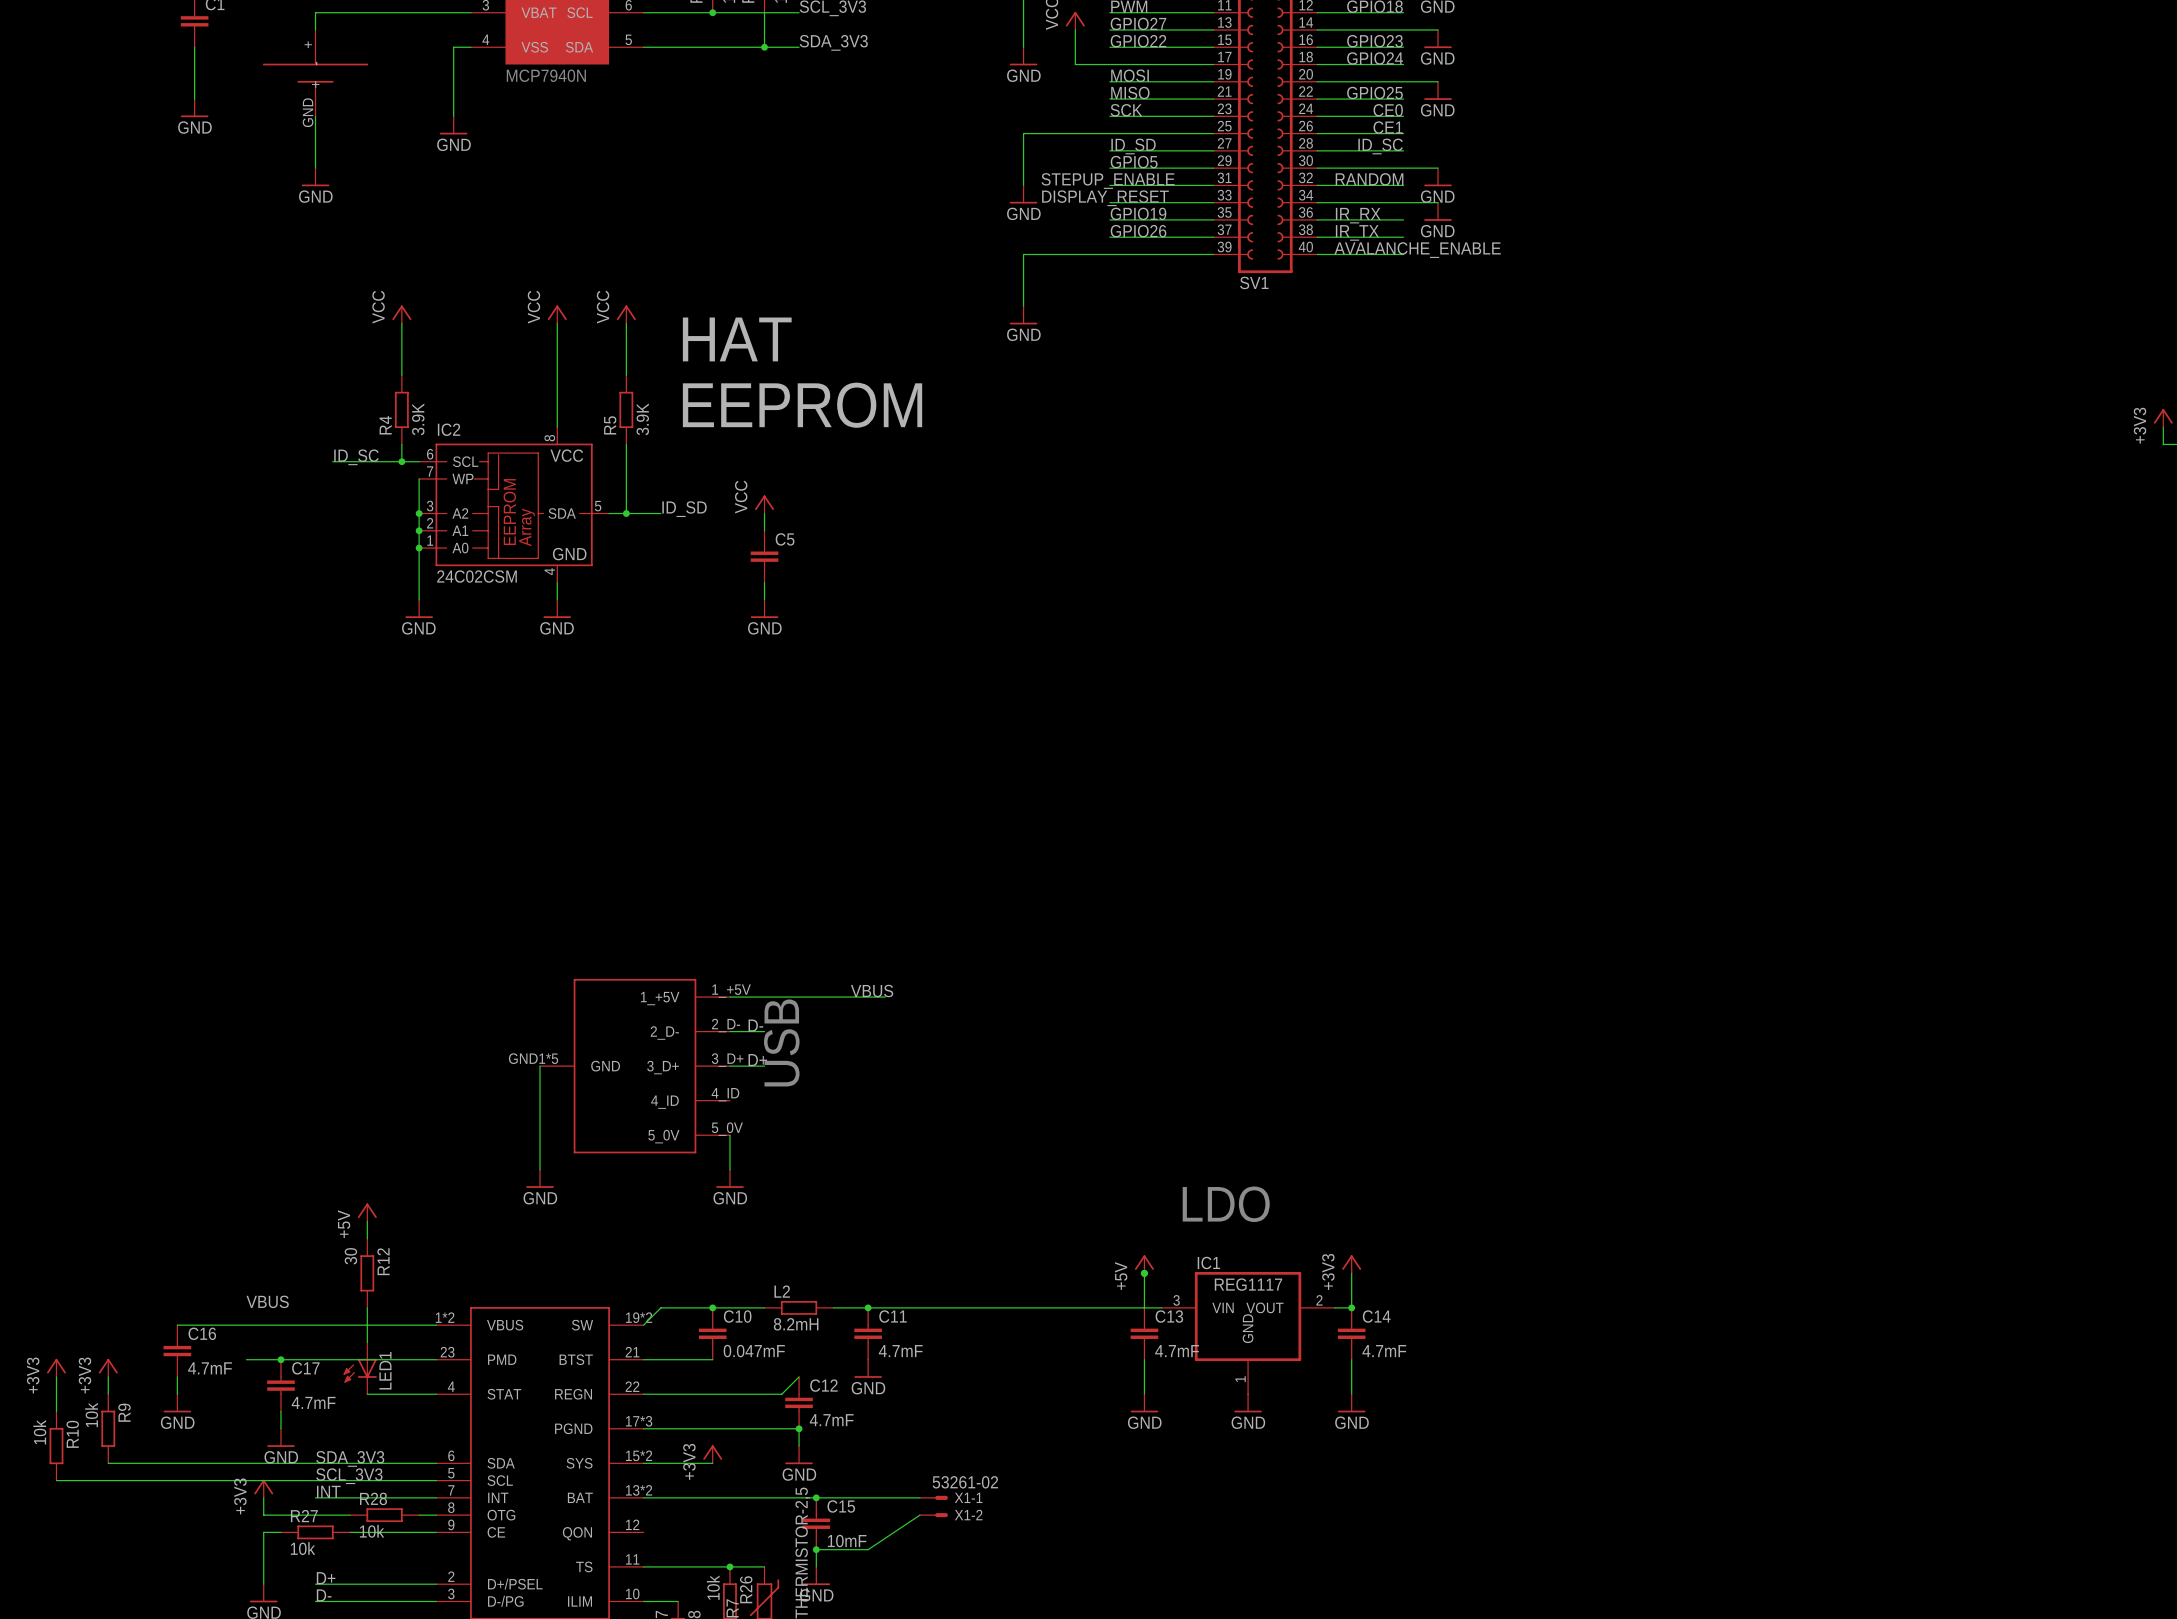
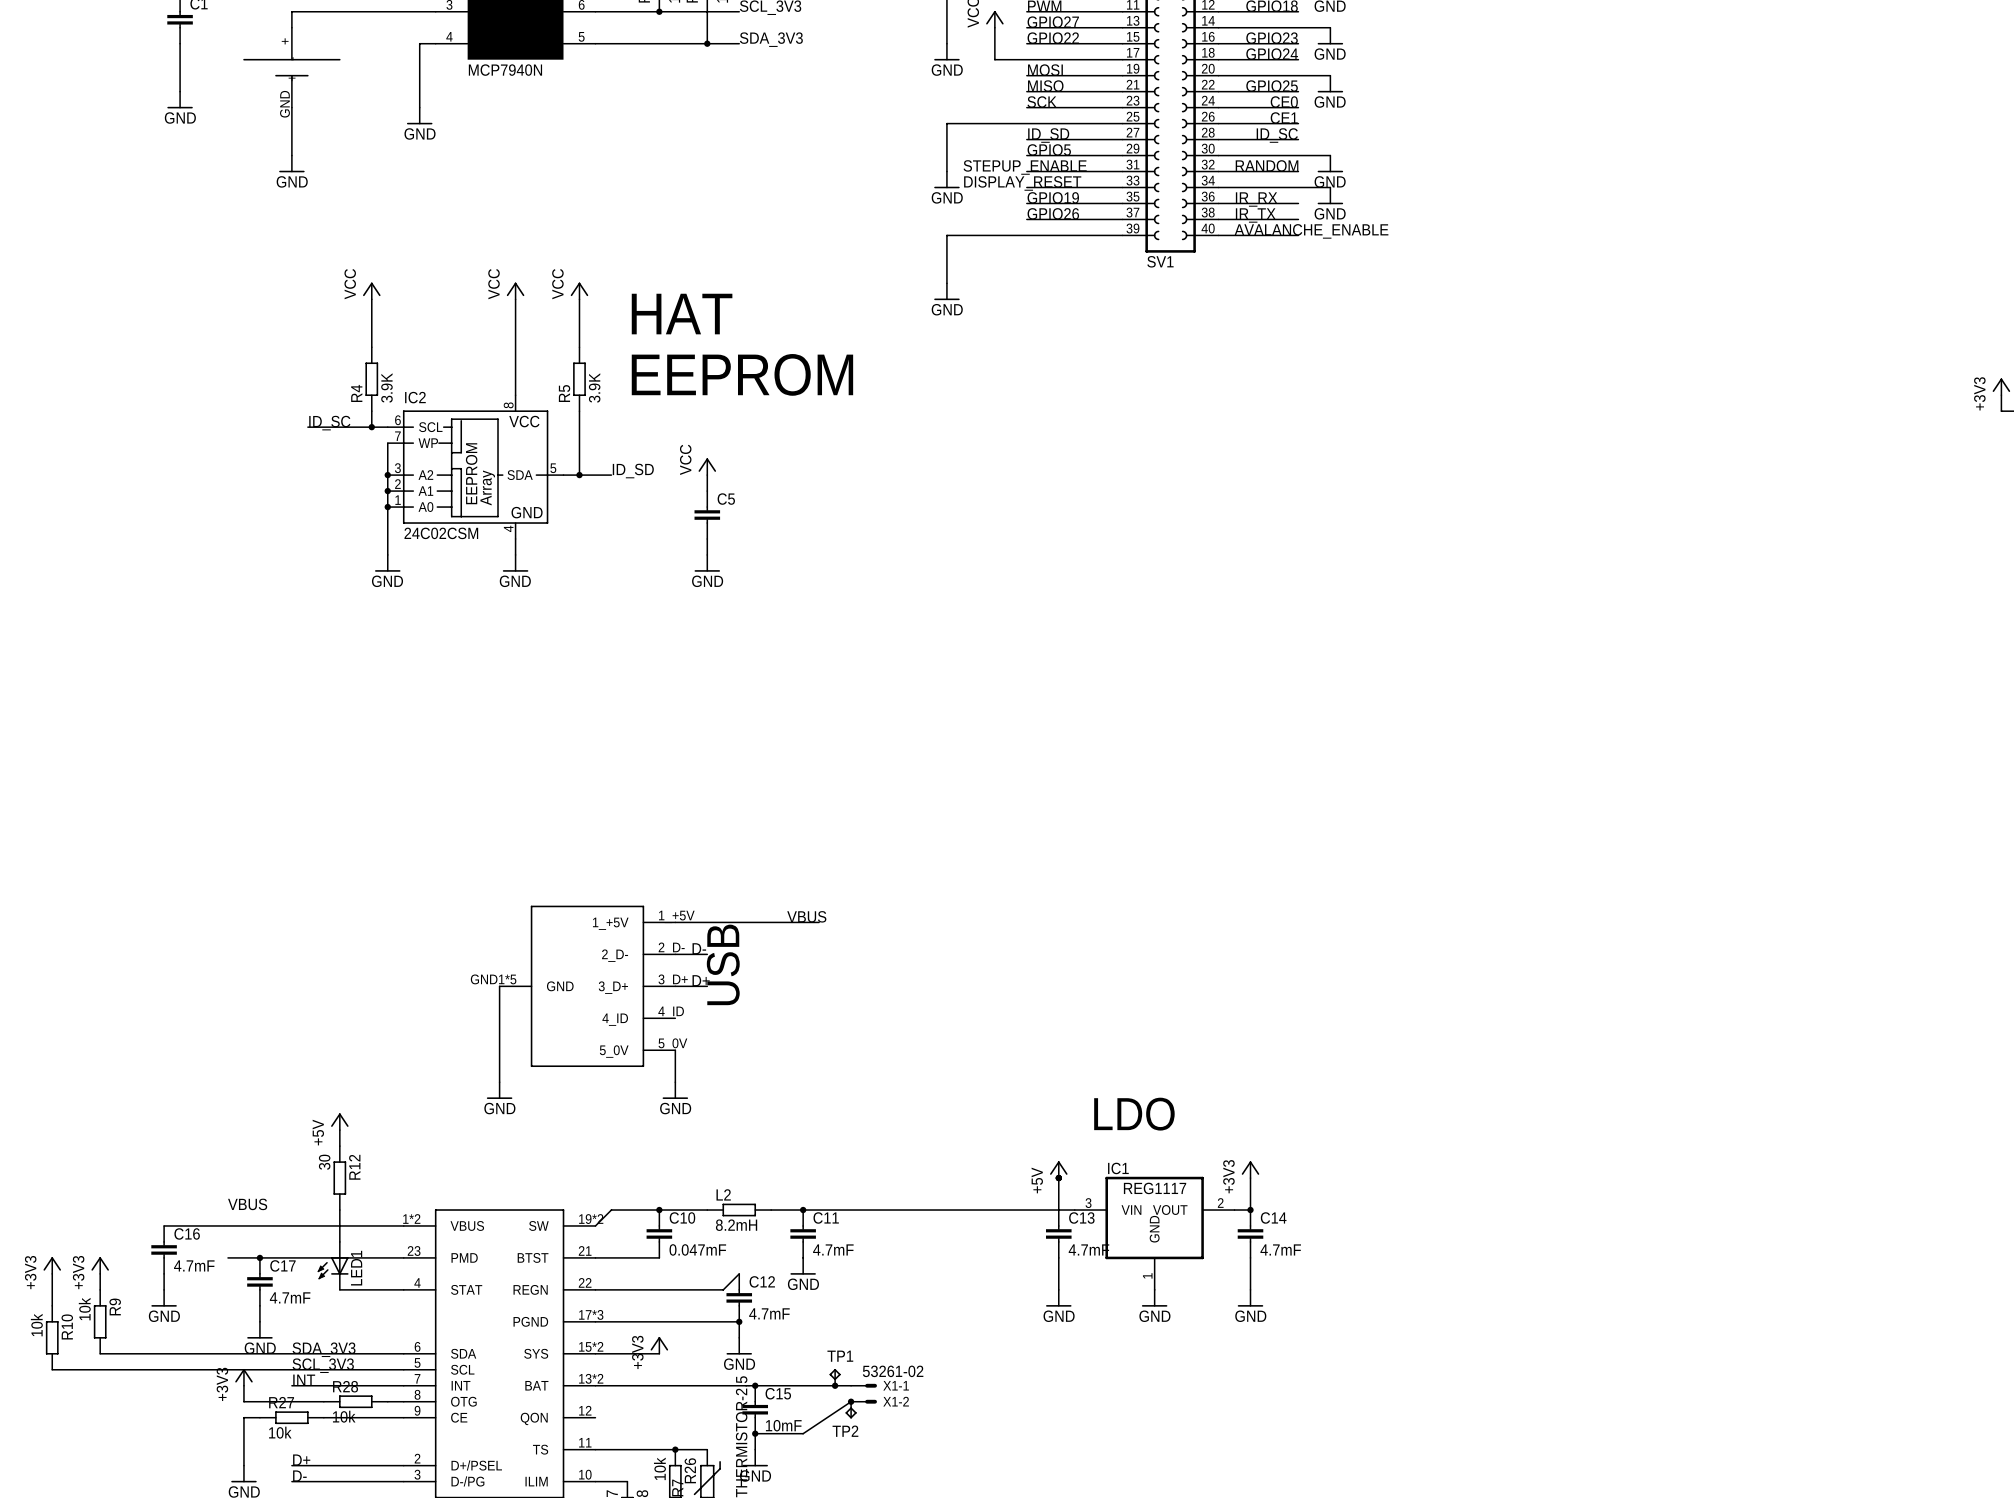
TP1: none -> (835, 1377)
junction: none -> (835, 1385)
junction: none -> (851, 1401)
TP2: none -> (851, 1410)

